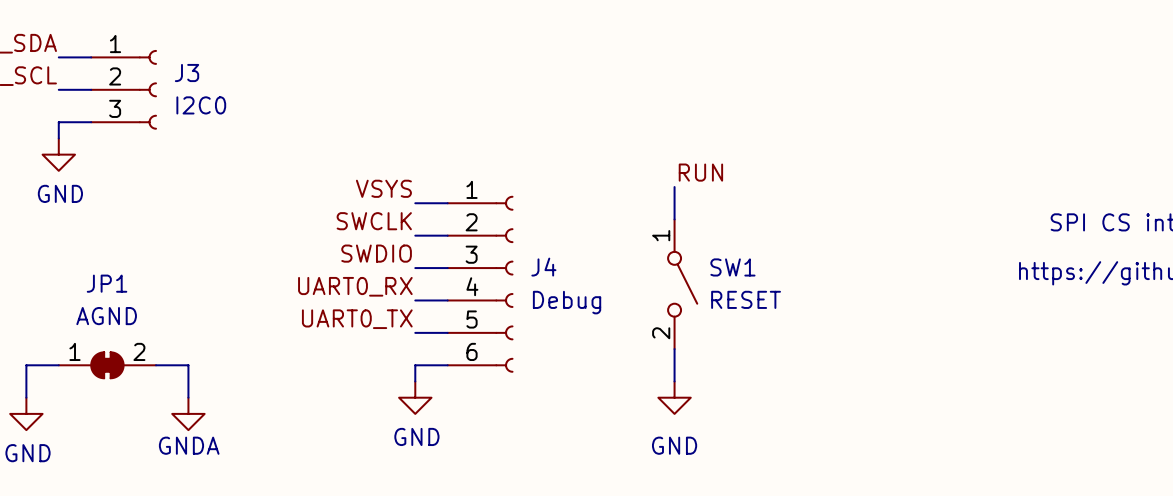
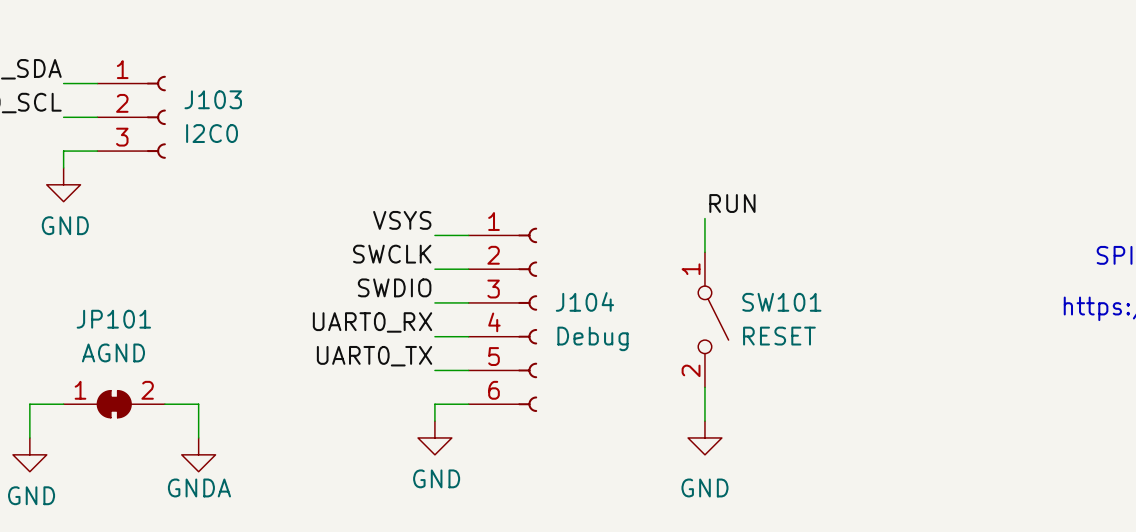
J3 name: J3 (187, 73) -> J103 (213, 99)
J4 name: J4 (543, 267) -> J104 (584, 301)
SW1 name: SW1 (732, 267) -> SW101 (781, 302)
JP1 name: JP1 (107, 283) -> JP101 (113, 319)

